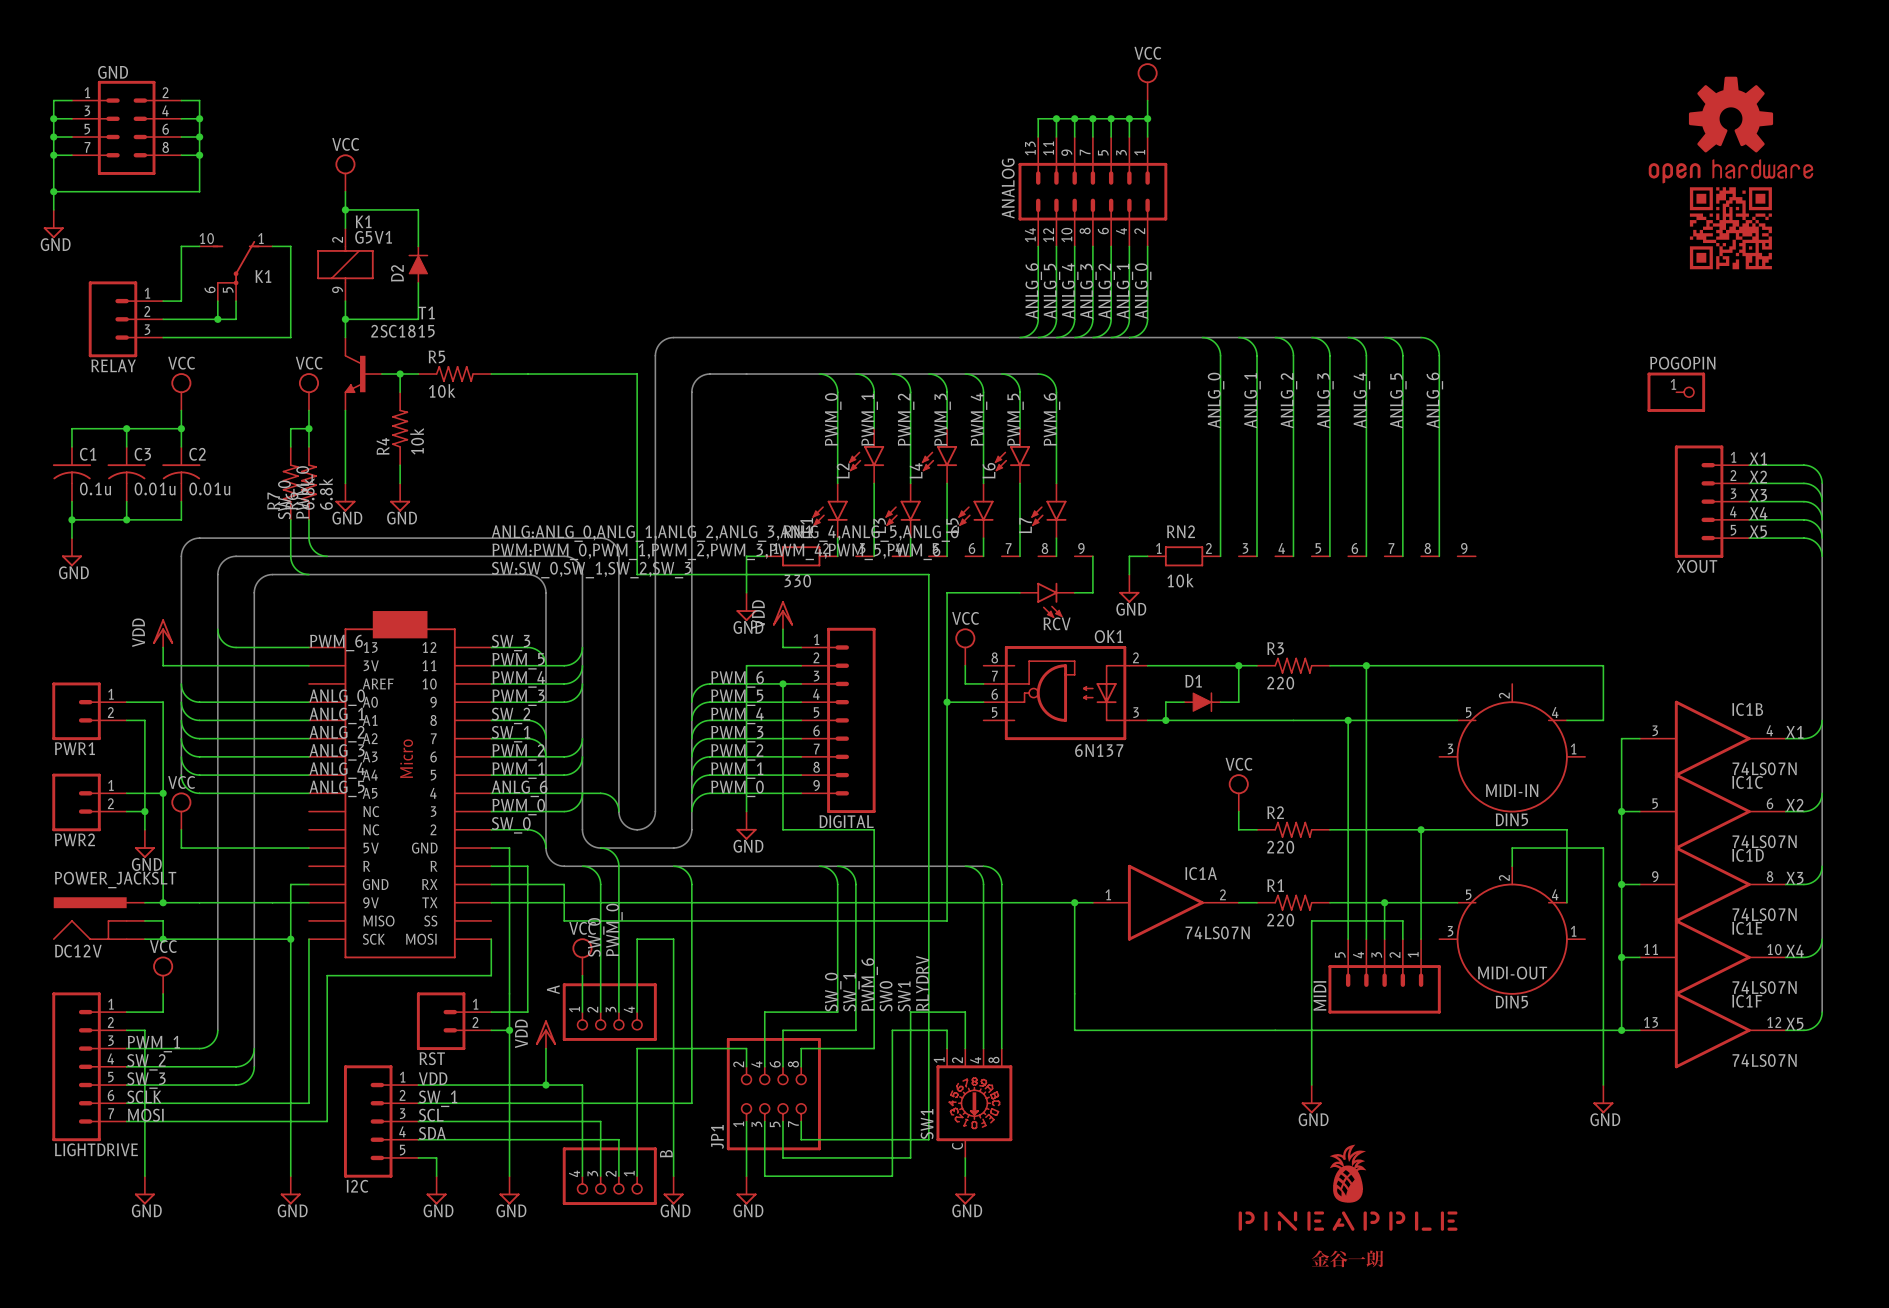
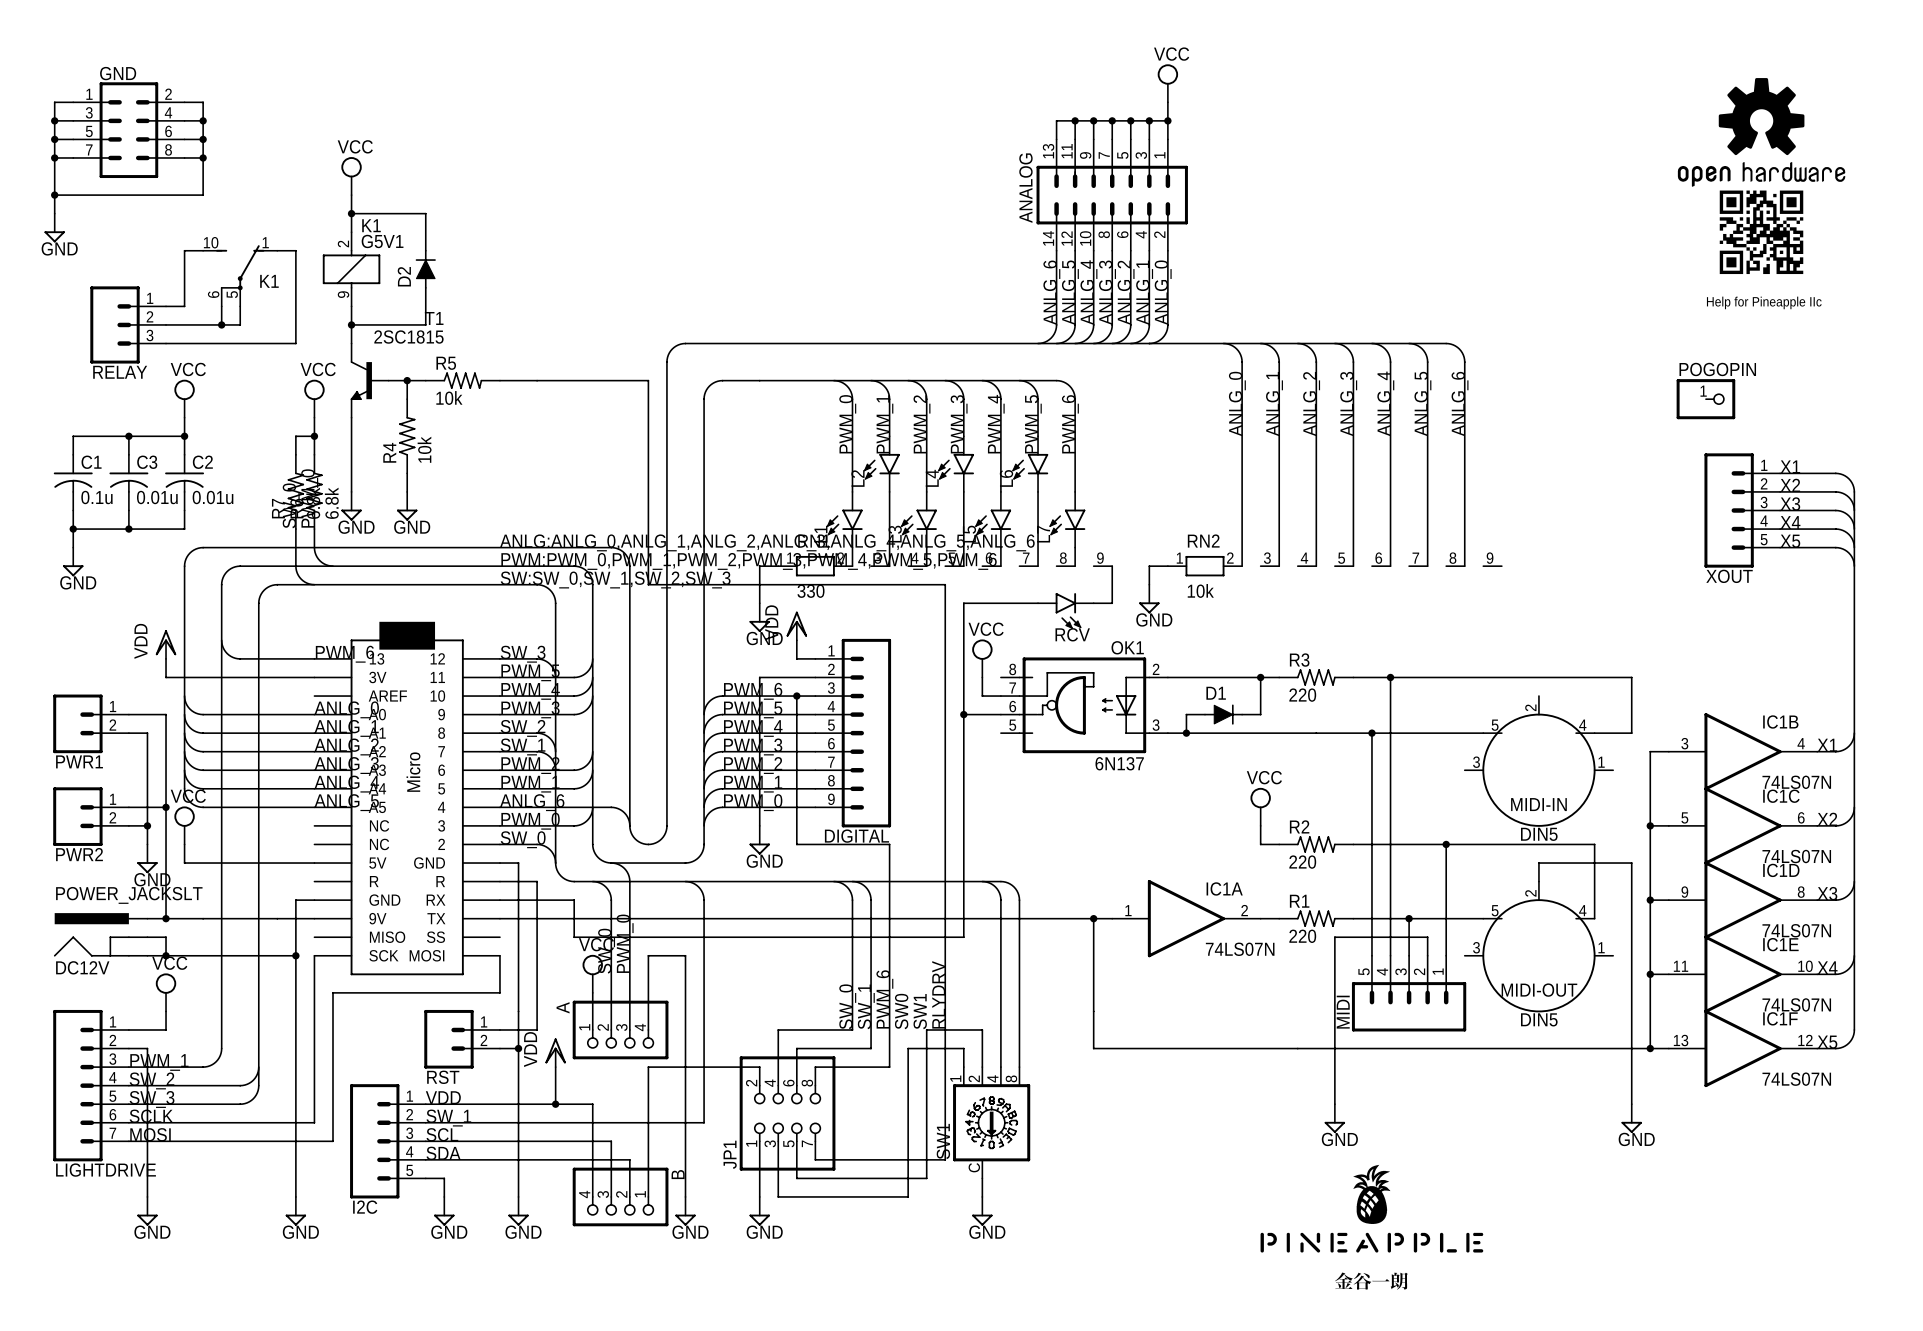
part: none -> (1764, 302)

